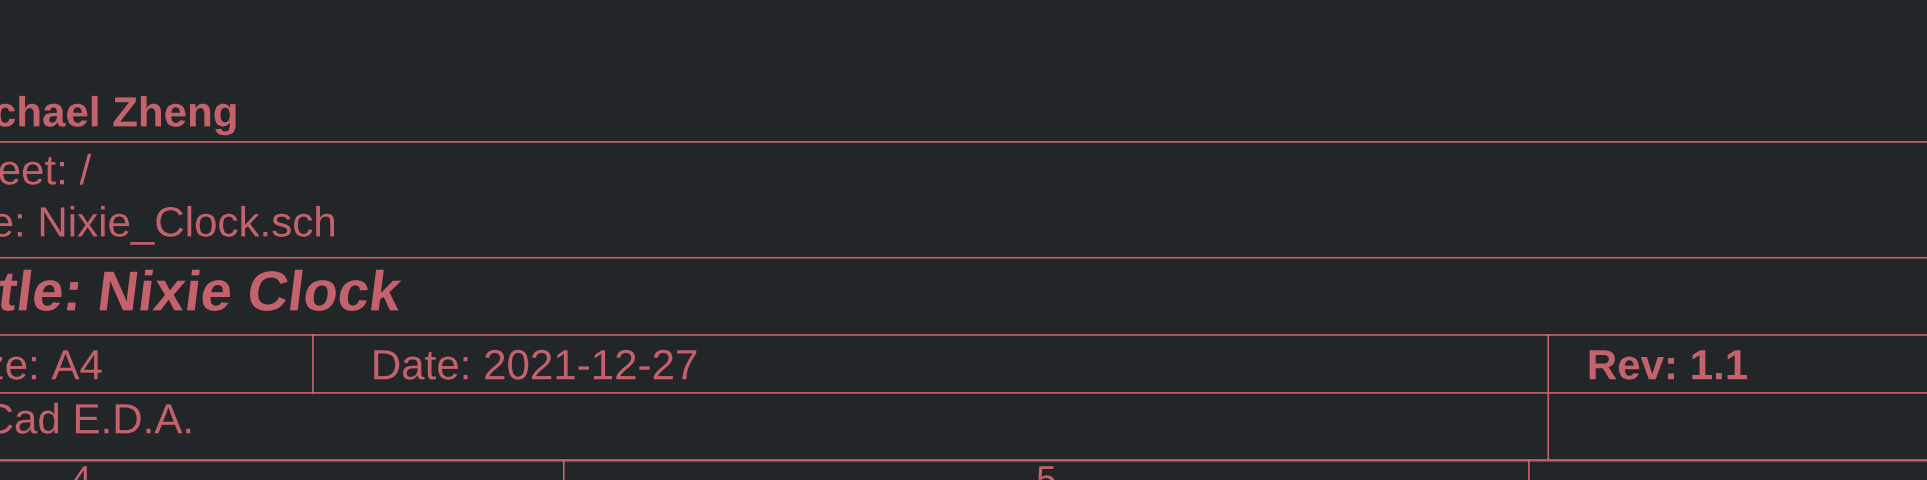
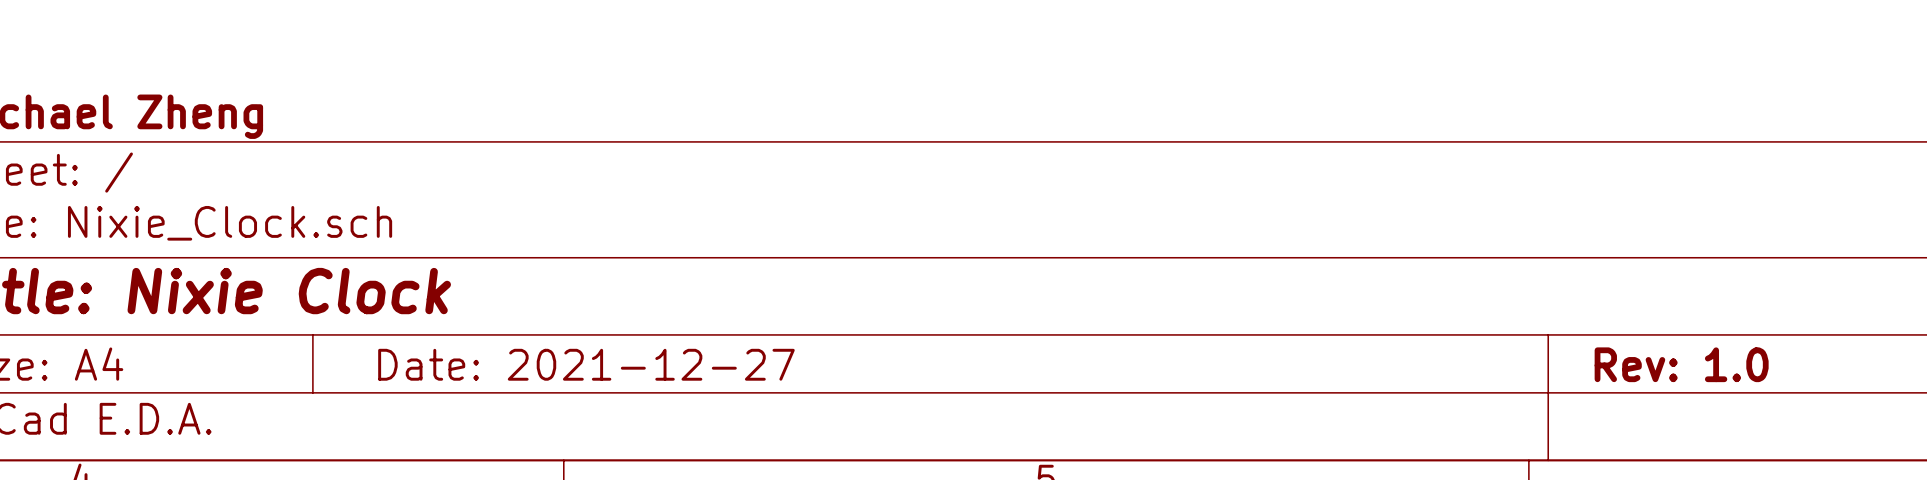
title block: Rev: 1.1 (1668, 364) -> Rev: 1.0 (1681, 364)

